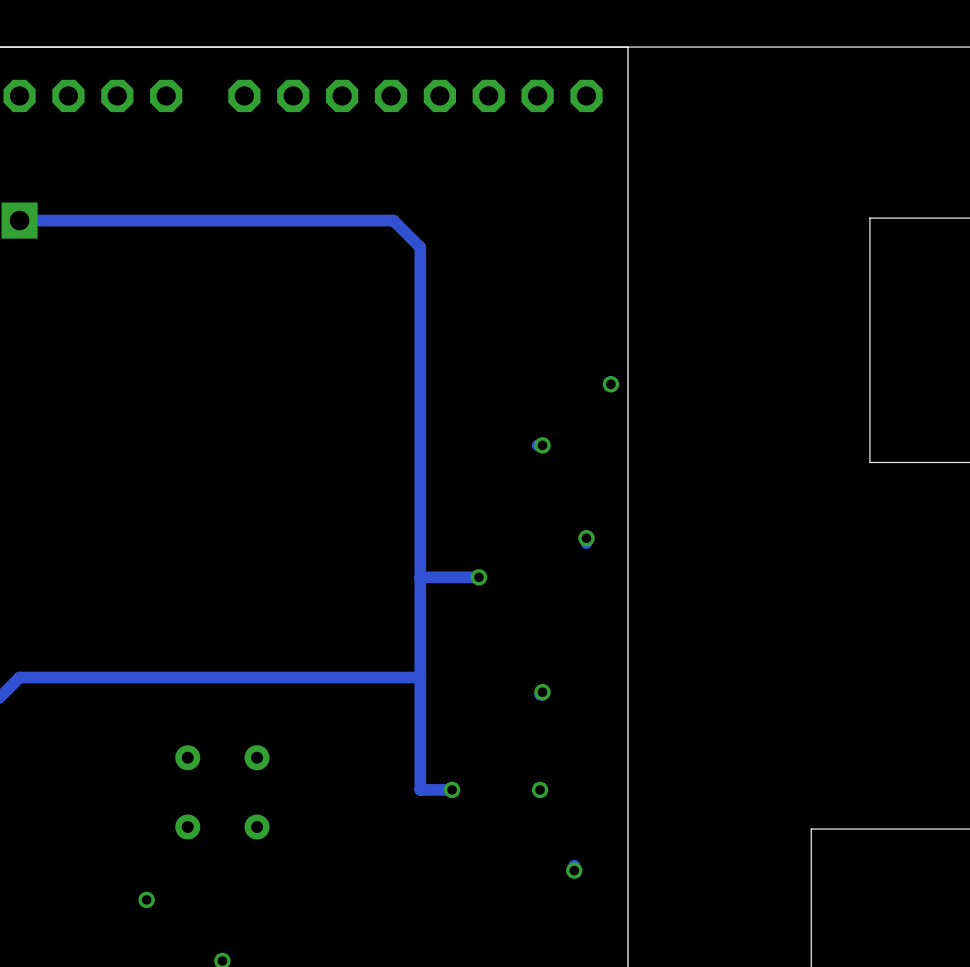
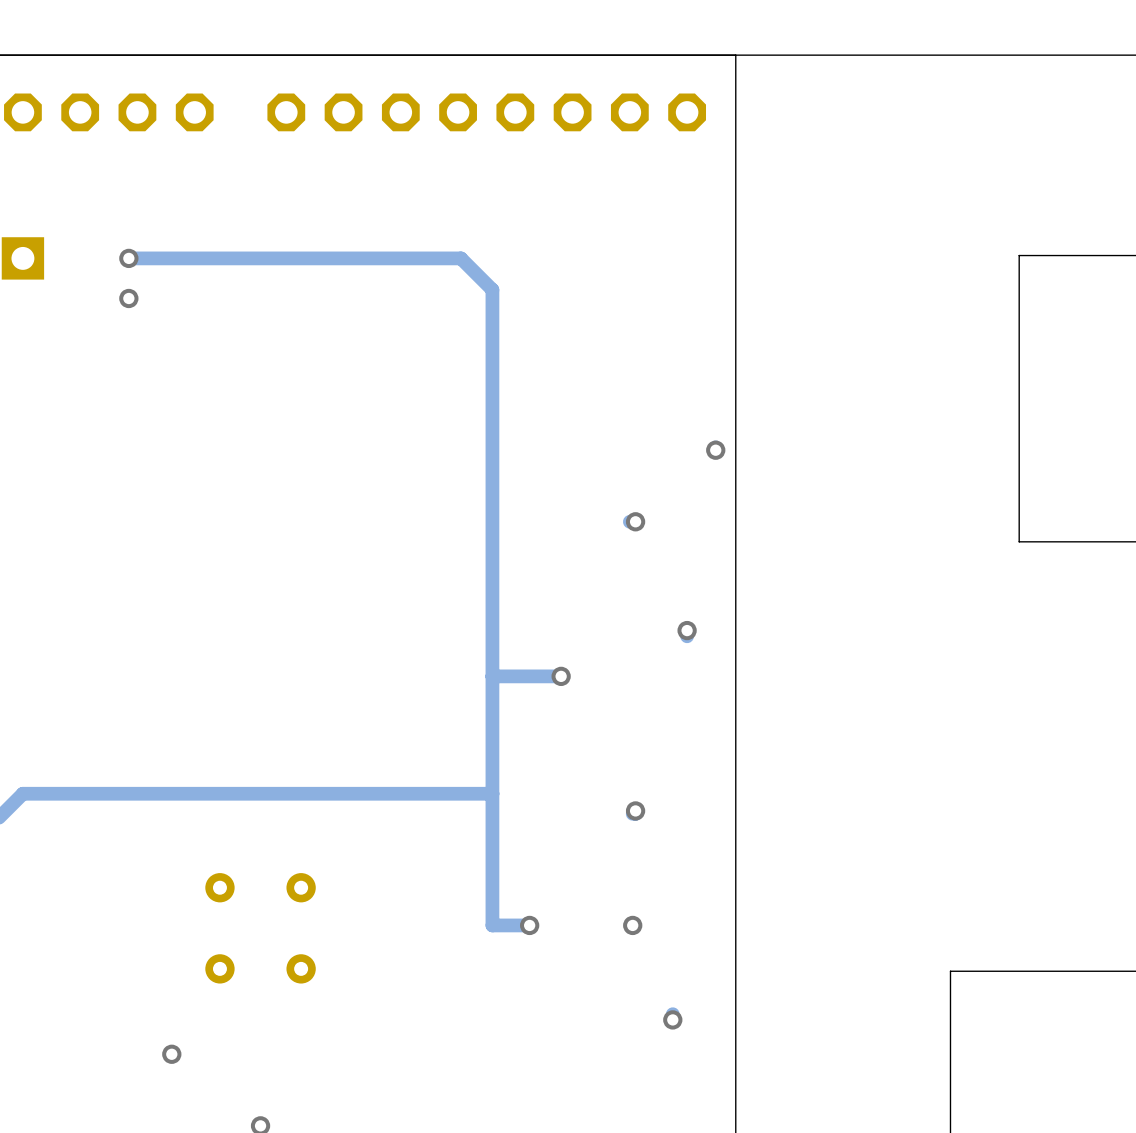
track: (109, 220) (19, 220) -> none
via: none -> (128, 258)
via: none -> (128, 298)

